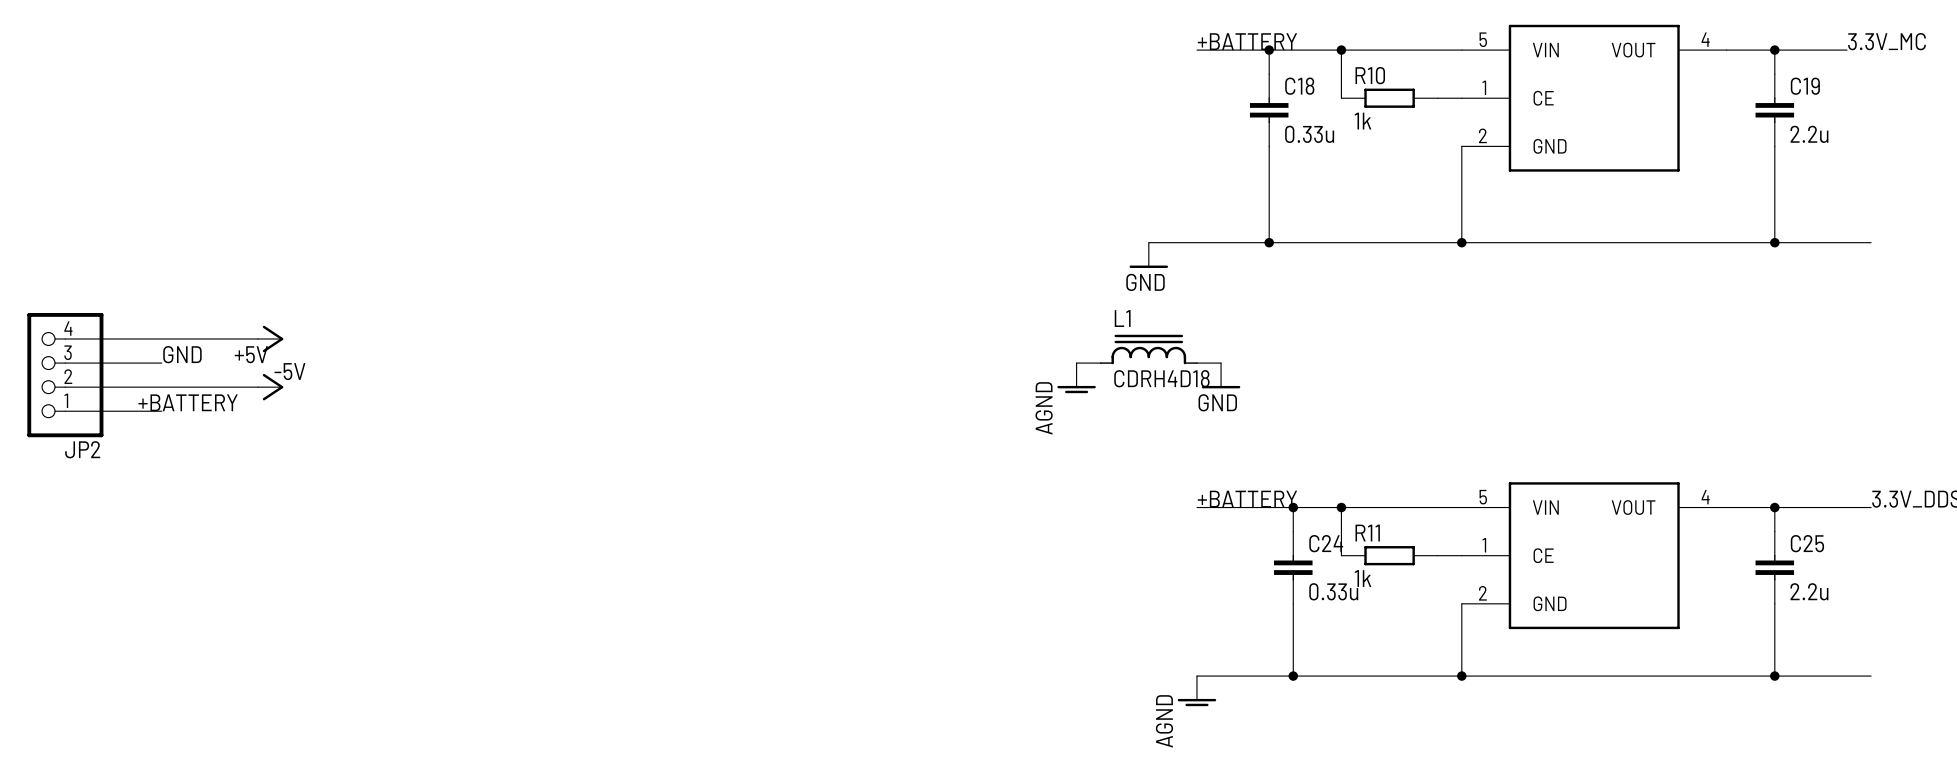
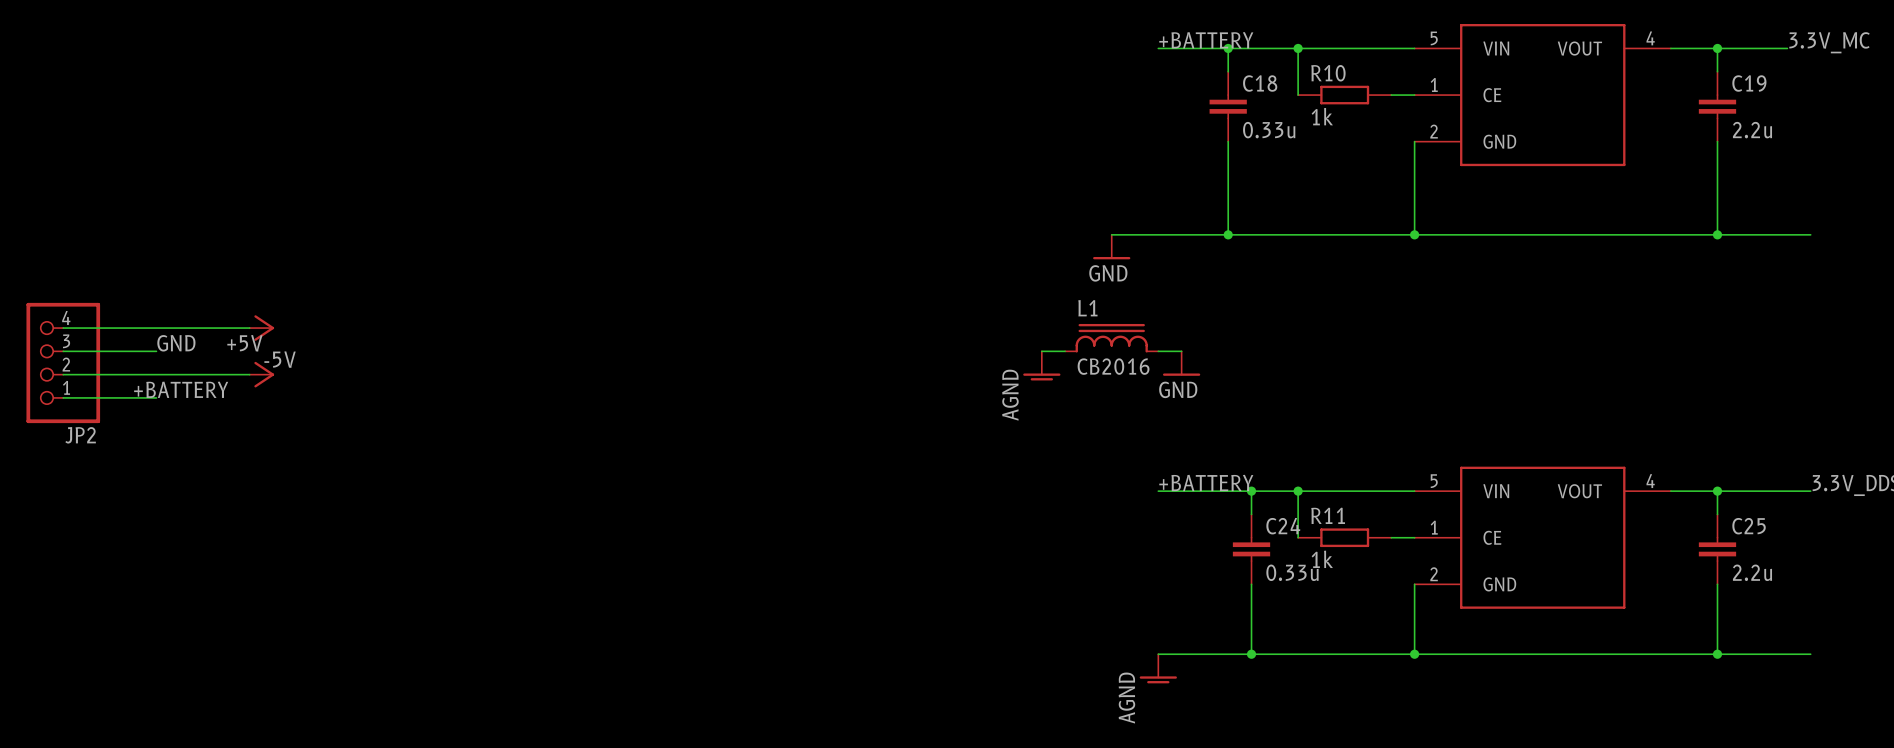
L1 value: CDRH4D18 (1161, 378) -> CB2016 (1113, 366)

